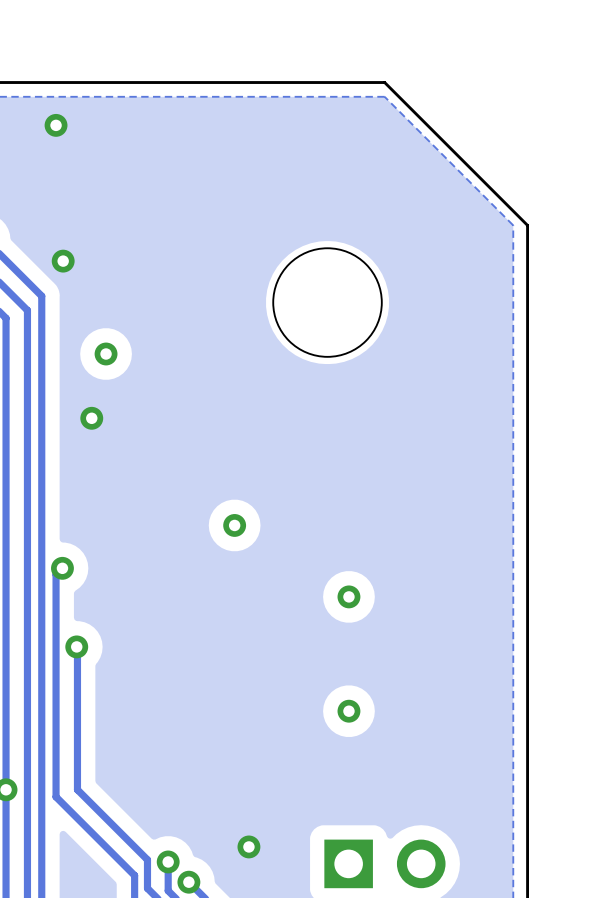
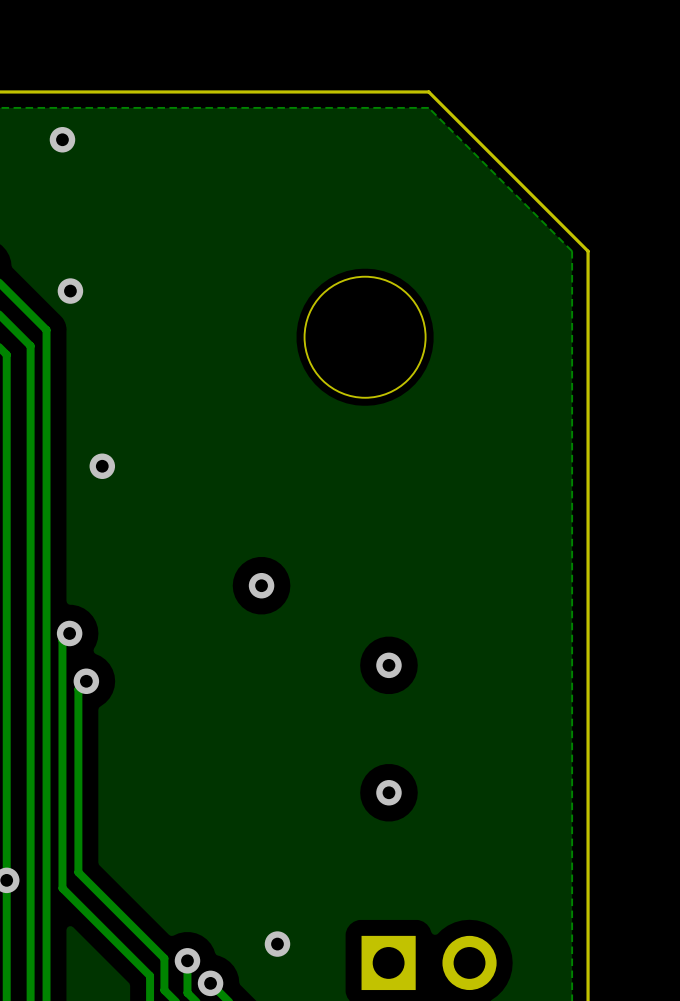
via: (106, 353) -> none
track: (76, 646) (77, 789) -> (86, 681) (78, 689) (78, 872) (86, 880)
via position: (76, 646) -> (86, 681)

